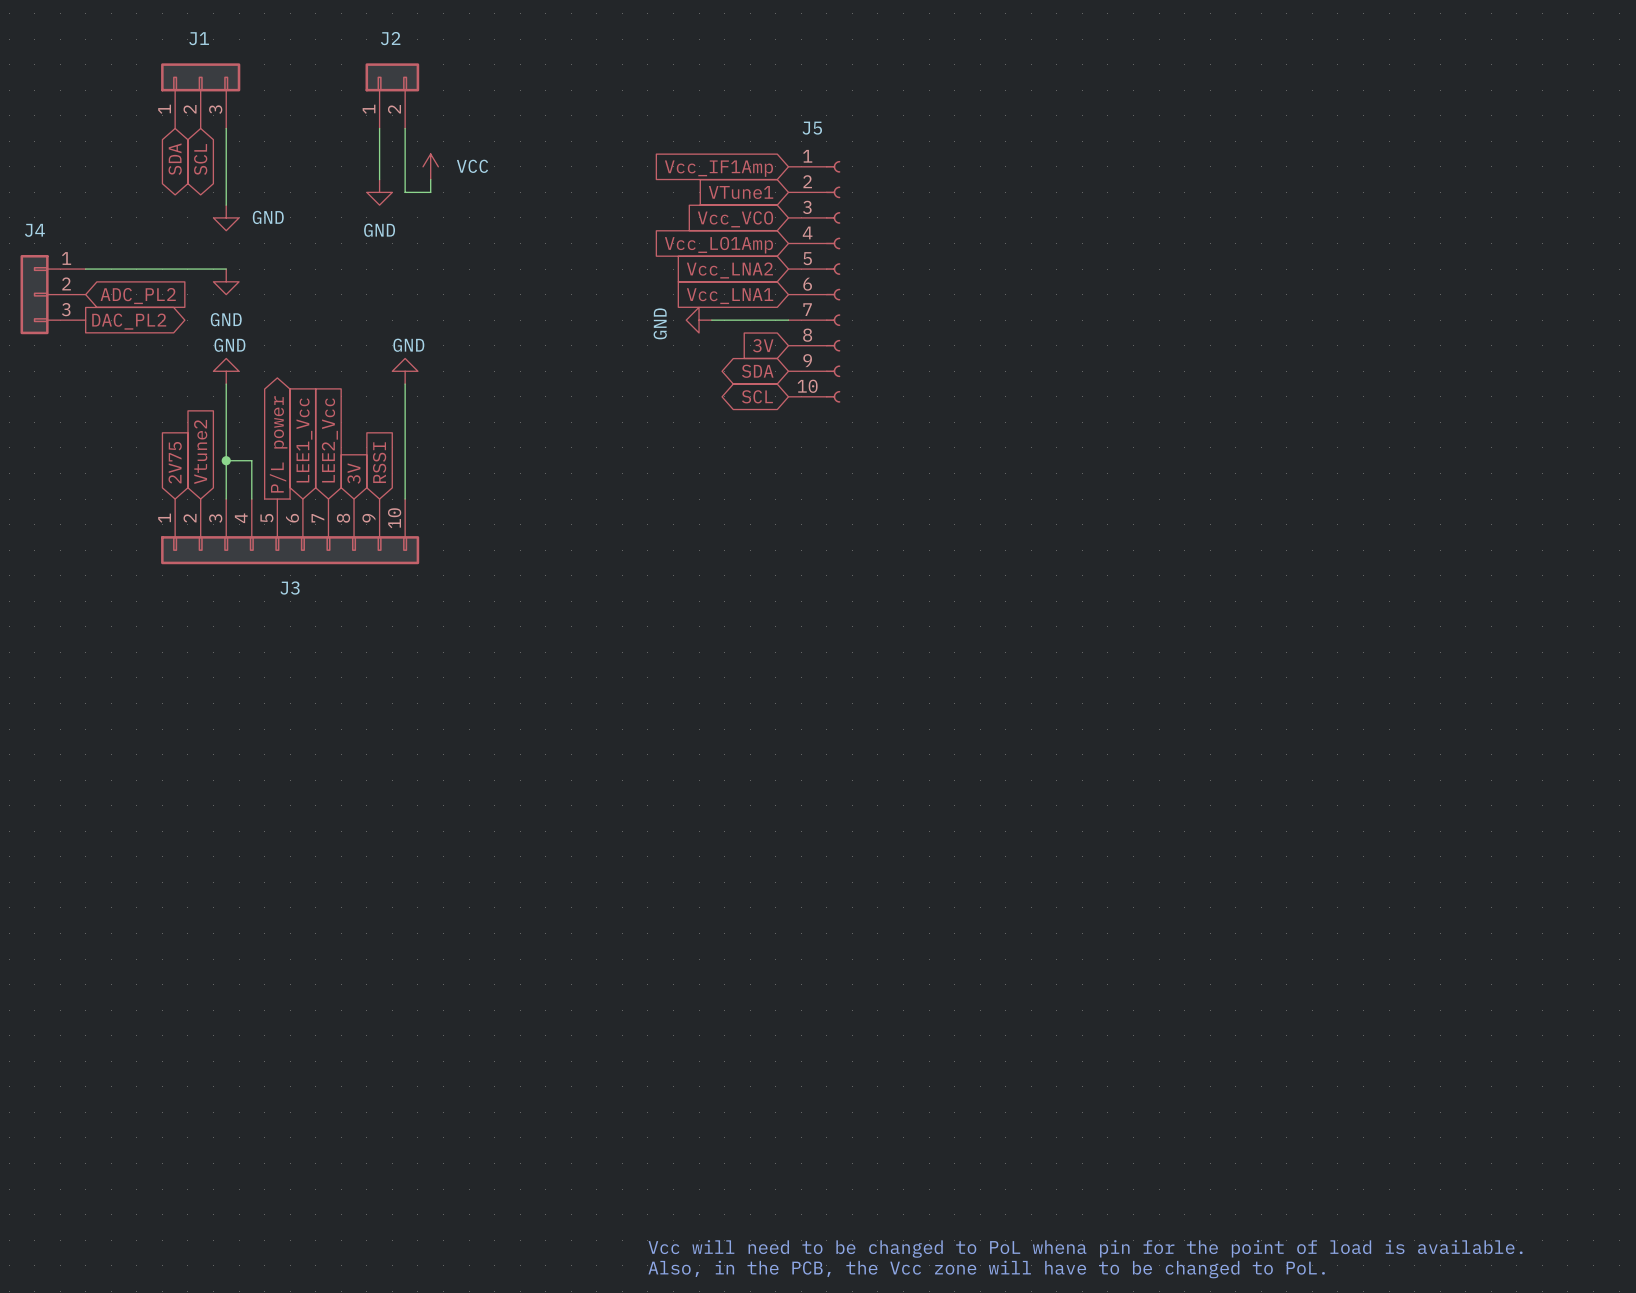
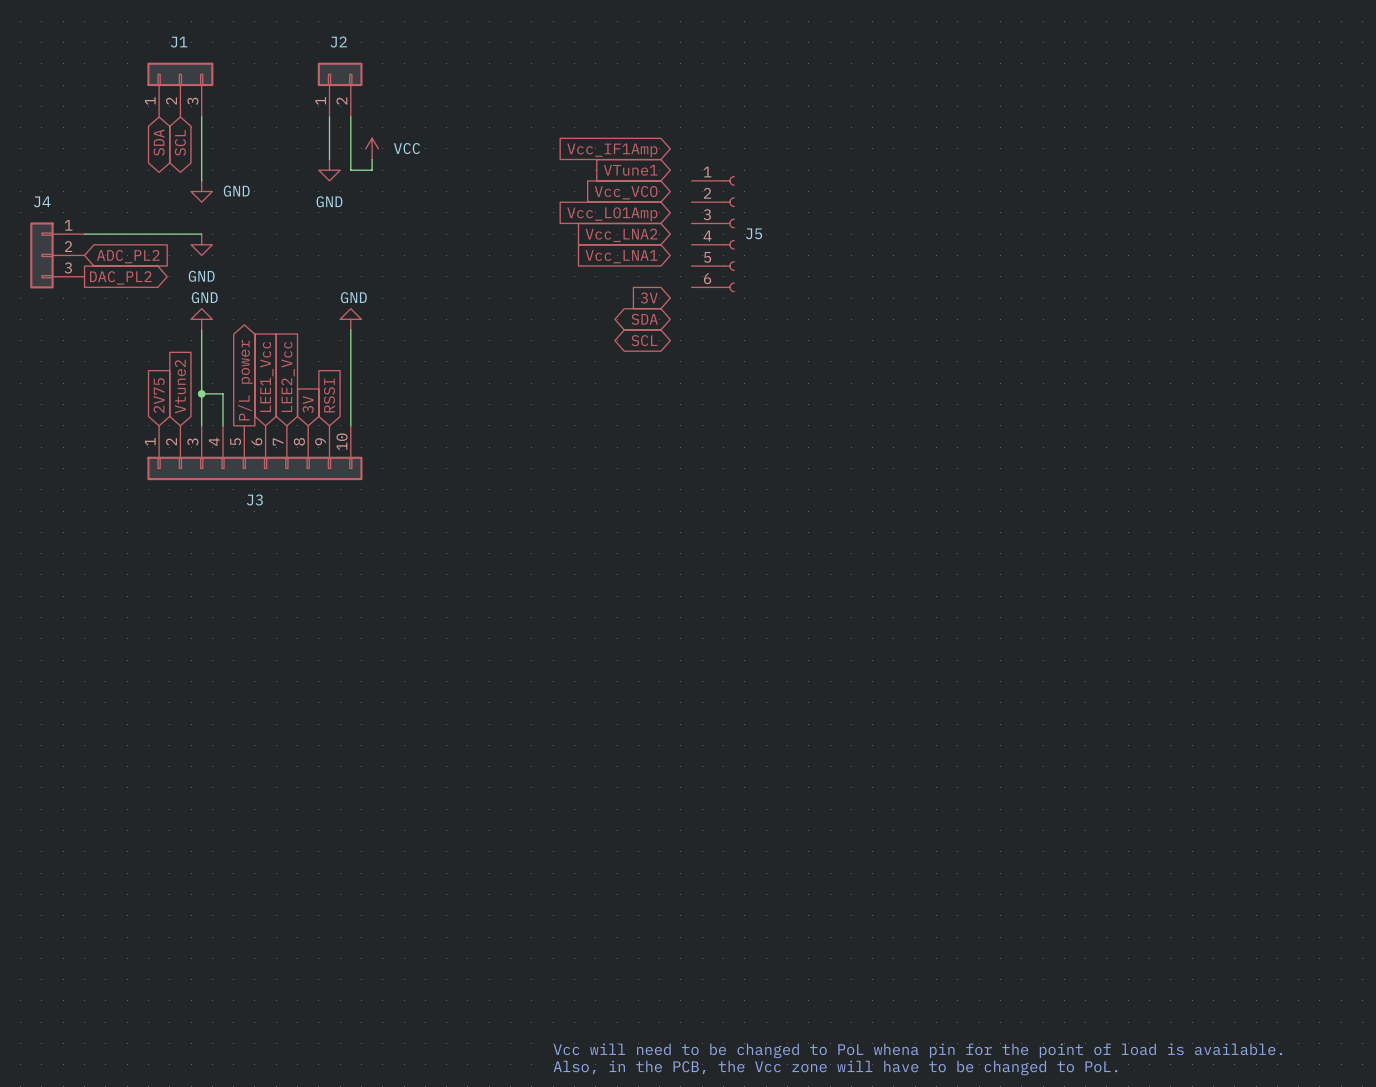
J5 name position: J5 (812, 128) -> J5 (754, 233)
J5 symbol: [788, 160, 841, 403] -> [691, 175, 735, 293]
power symbol: GND (699, 320) -> none
wire: (711, 320) (788, 320) -> none

